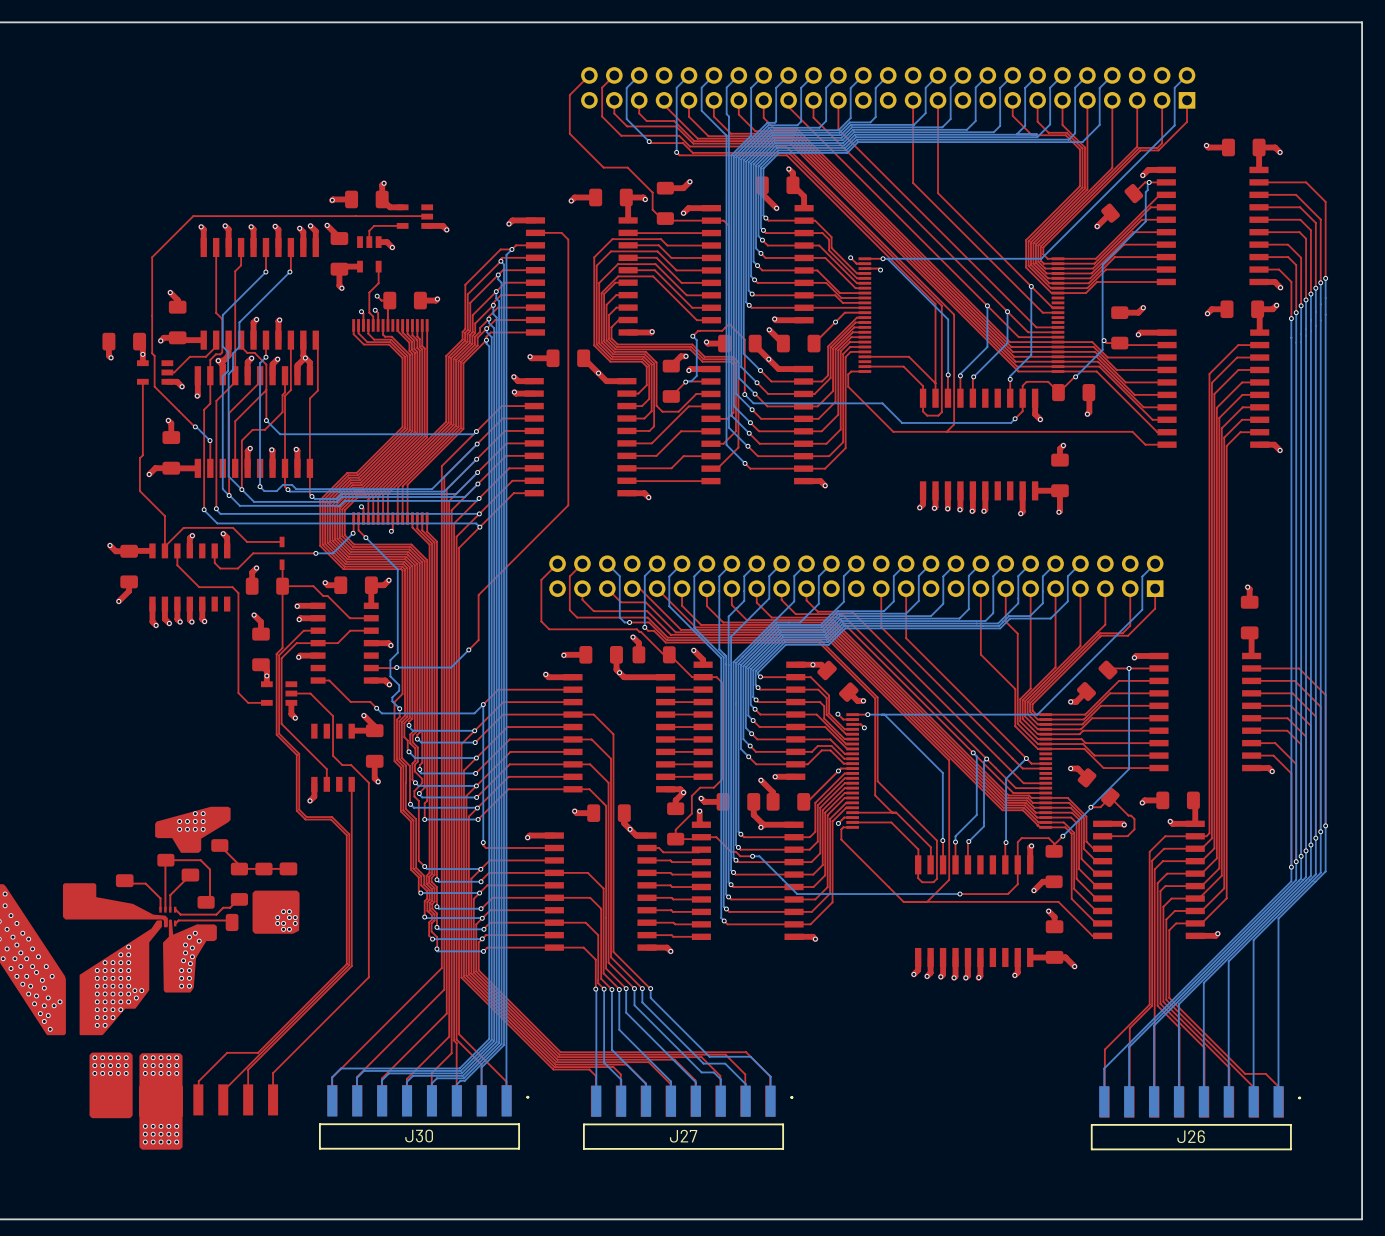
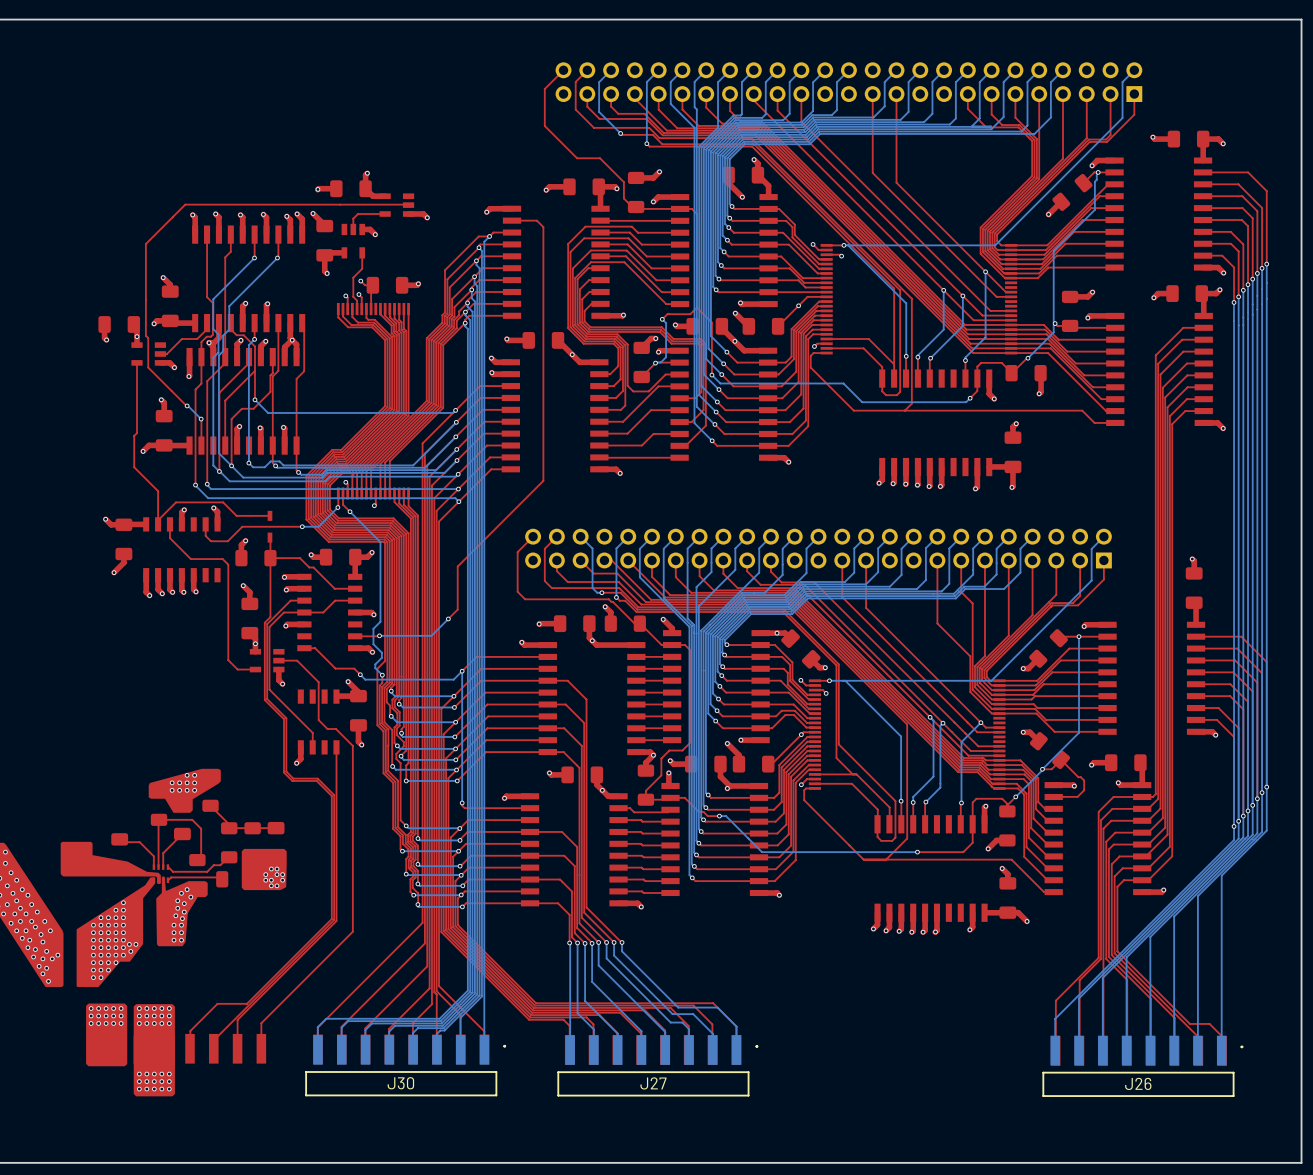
top track: none -> (826, 343) (817, 343) (814, 346)
via: none -> (814, 346)

